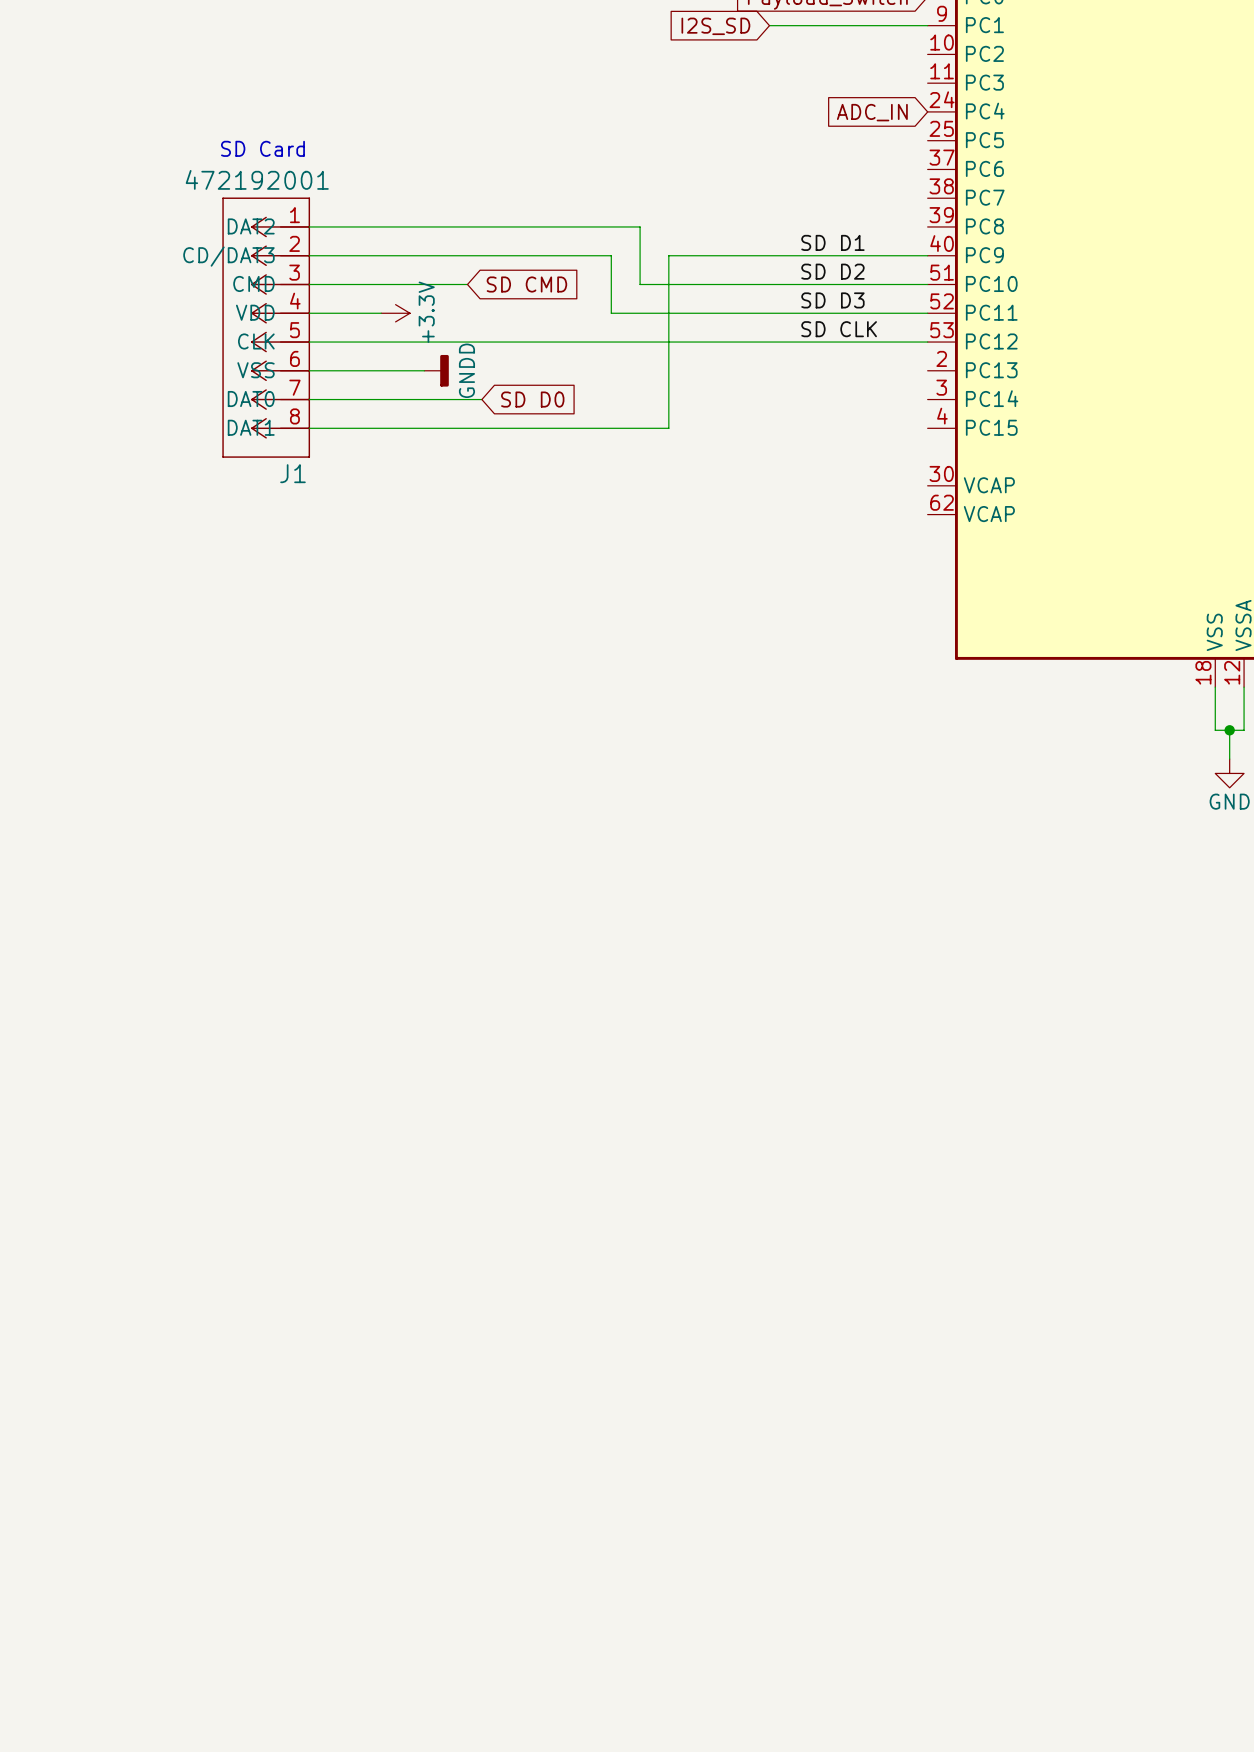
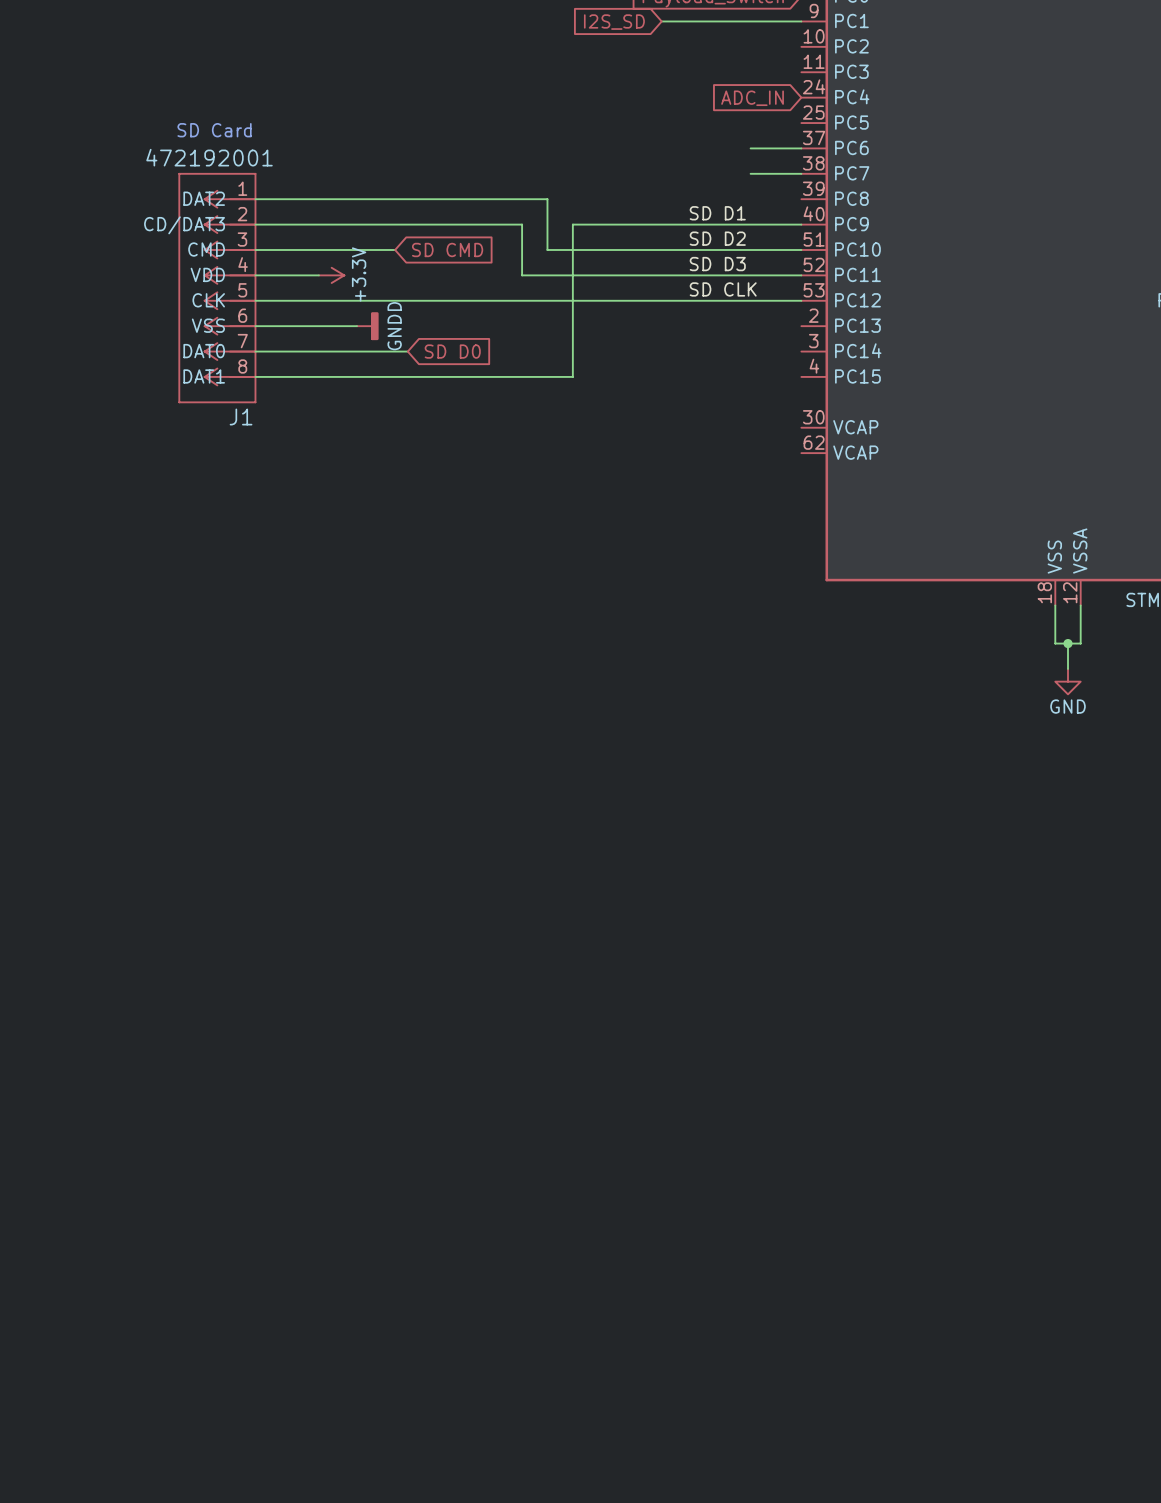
wire: none -> (750, 148) (801, 148)
wire: none -> (750, 173) (801, 173)

